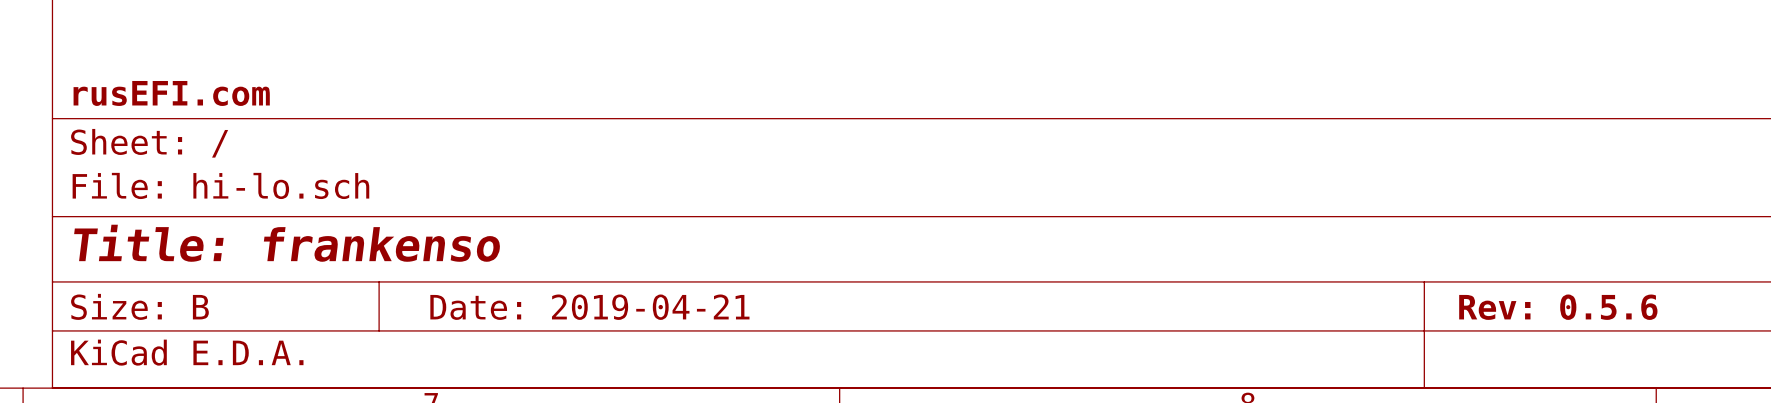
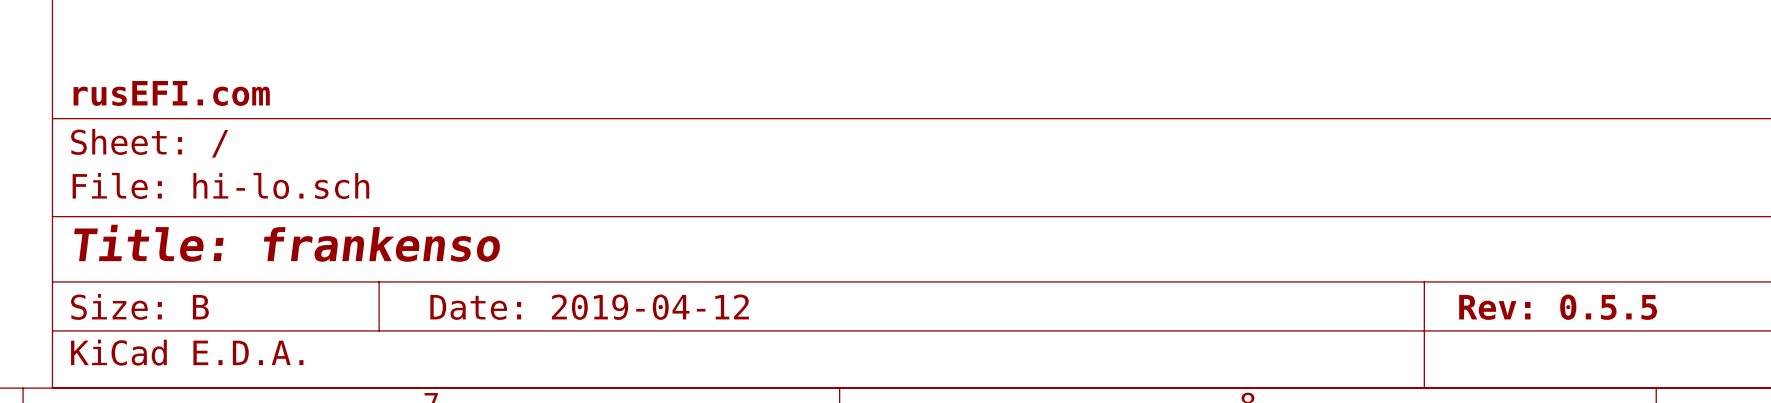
title block: Date: 2019-04-21 (589, 307) -> Date: 2019-04-12 (589, 307)
title block: Rev: 0.5.6 (1558, 307) -> Rev: 0.5.5 (1558, 307)

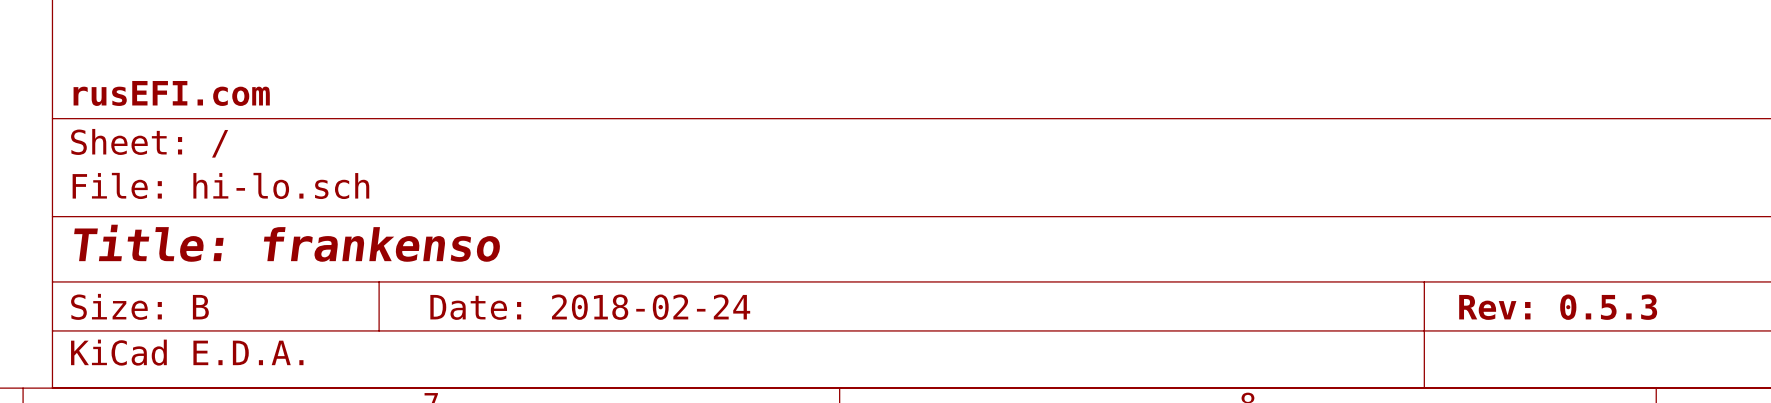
title block: Date: 2019-04-12 (589, 307) -> Date: 2018-02-24 (590, 307)
title block: Rev: 0.5.5 (1558, 307) -> Rev: 0.5.3 (1558, 307)

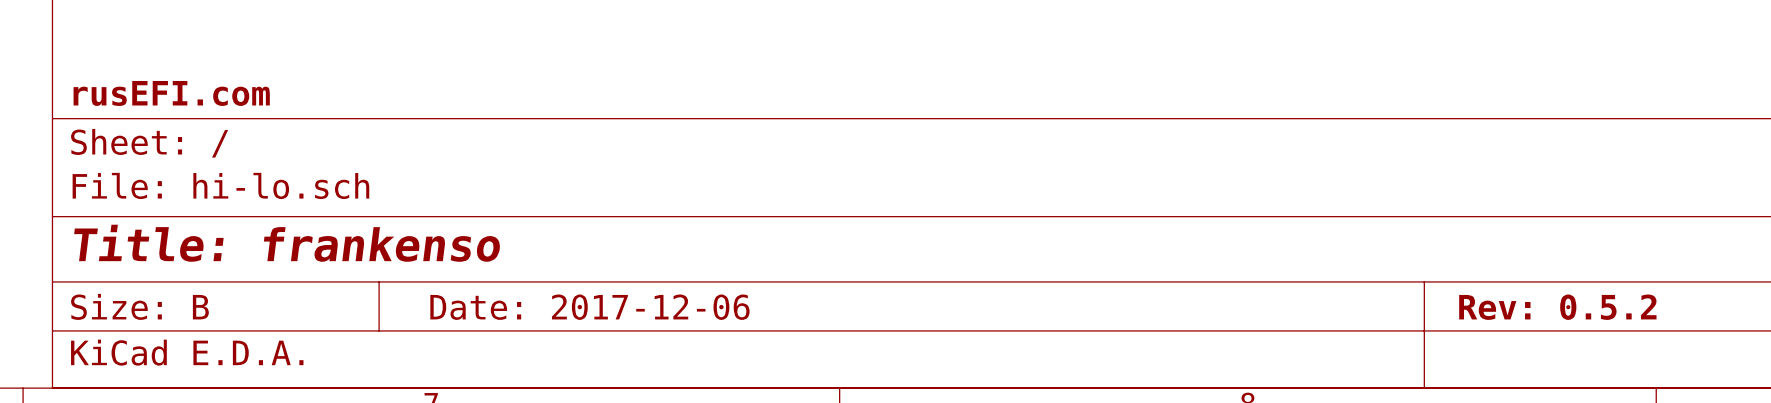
title block: Date: 2018-02-24 (590, 307) -> Date: 2017-12-06 (589, 307)
title block: Rev: 0.5.3 (1558, 307) -> Rev: 0.5.2 (1557, 307)

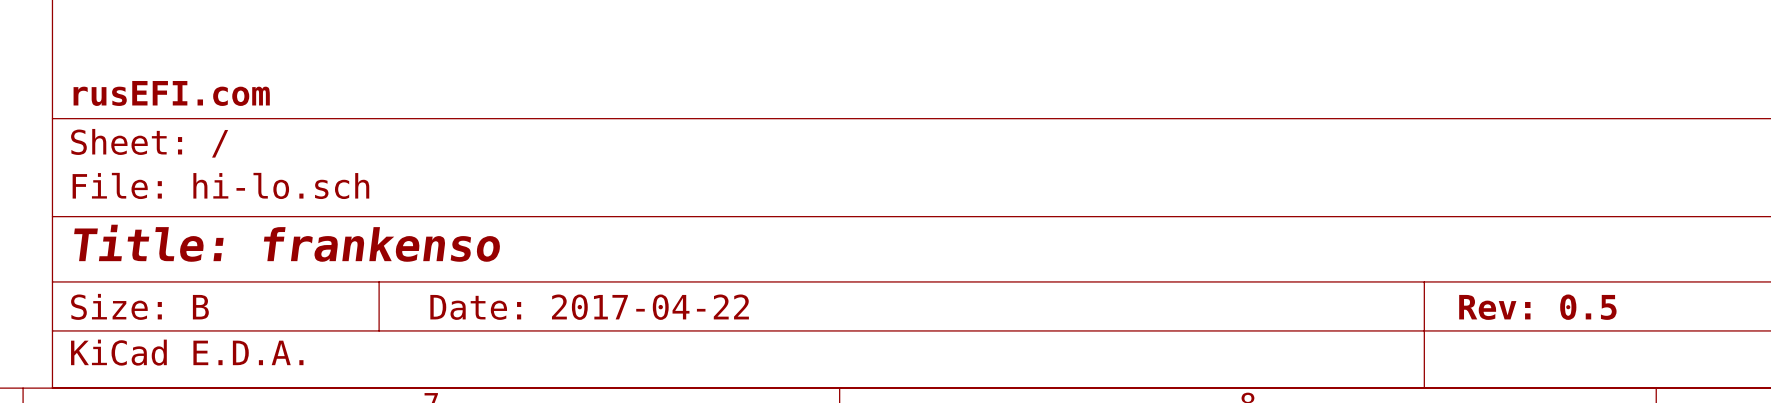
title block: Date: 2017-12-06 (589, 307) -> Date: 2017-04-22 (589, 307)
title block: Rev: 0.5.2 (1557, 307) -> Rev: 0.5 (1537, 307)

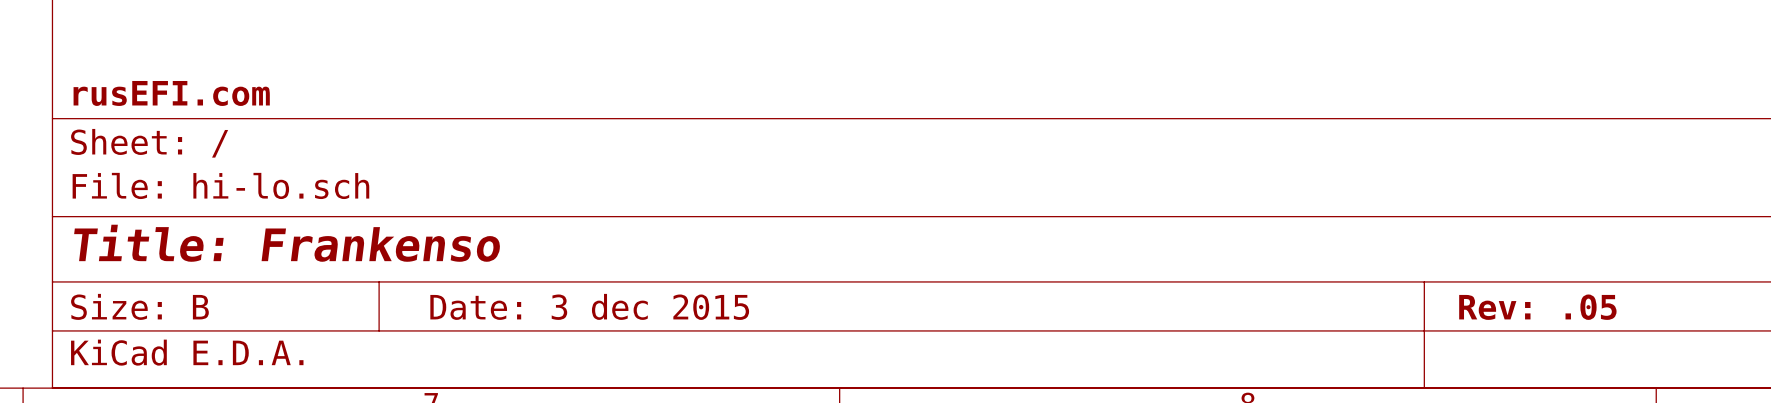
title block: Title: frankenso (287, 243) -> Title: Frankenso (287, 243)
title block: Date: 2017-04-22 (589, 307) -> Date: 3 dec 2015 (589, 306)
title block: Rev: 0.5 (1537, 307) -> Rev: .05 (1537, 307)

